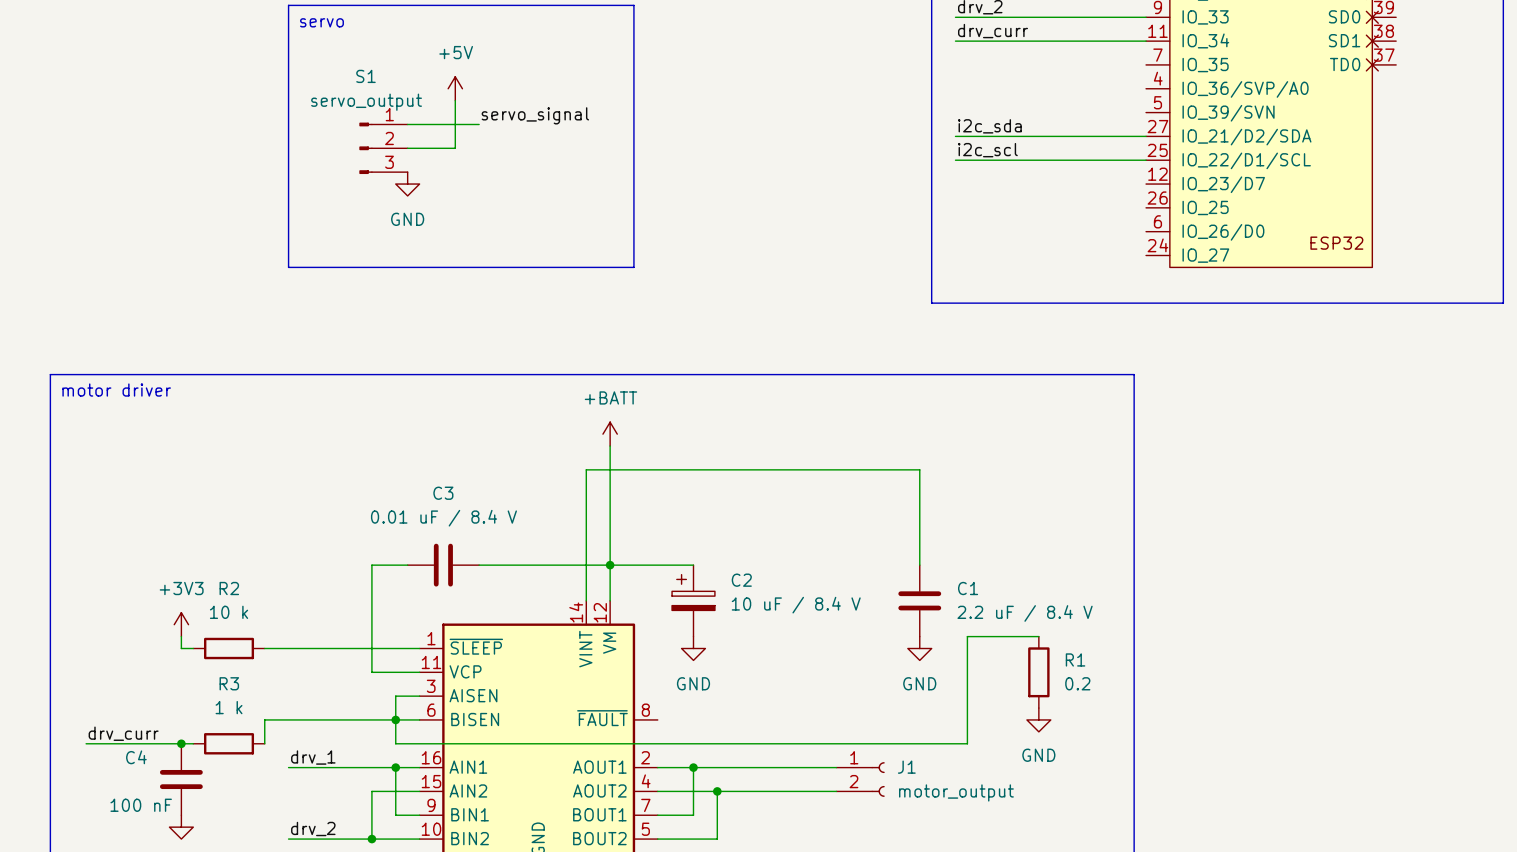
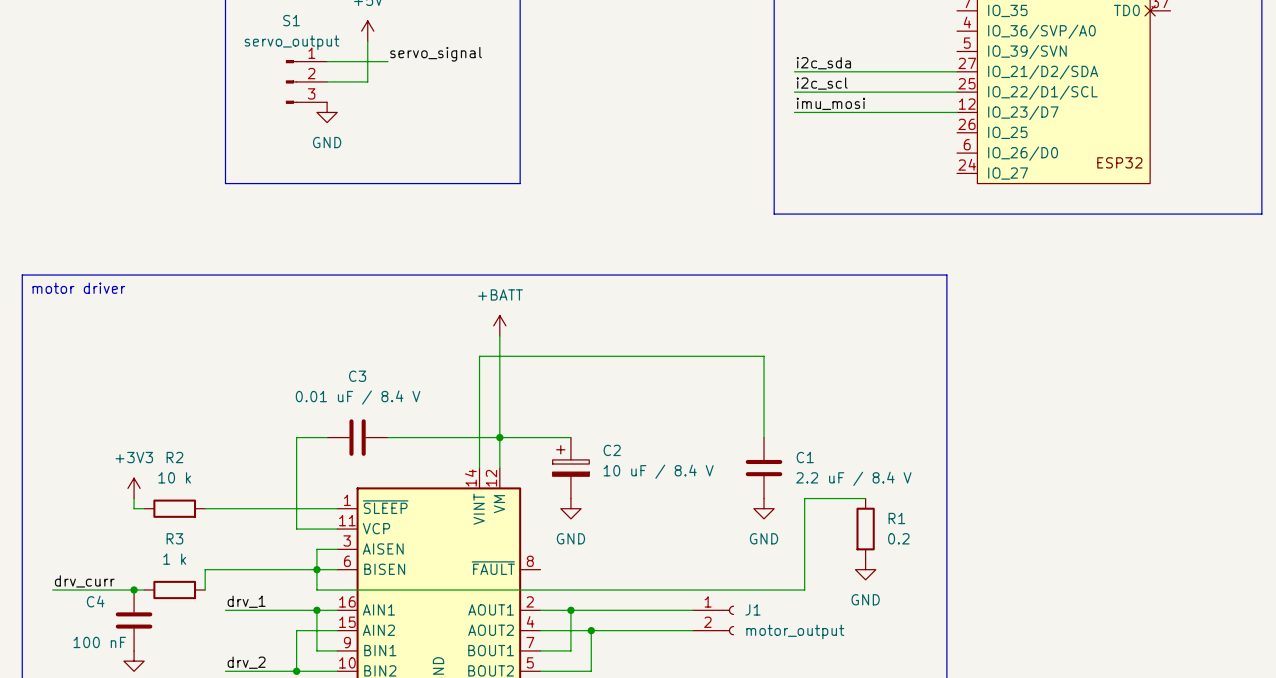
label: none -> imu_mosi (830, 103)
wire: none -> (794, 112) (957, 112)

